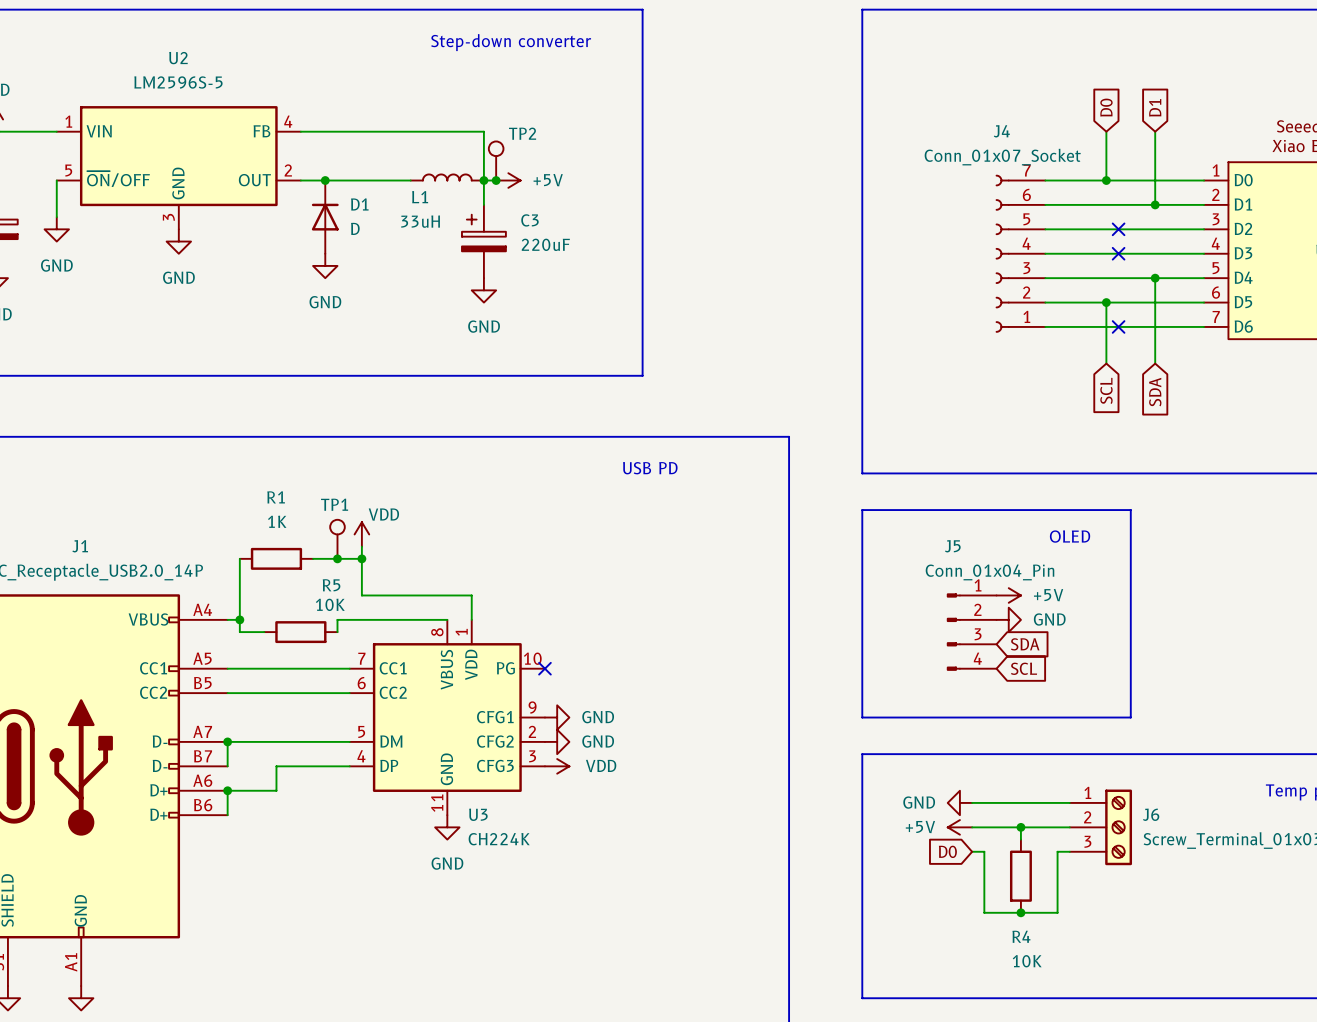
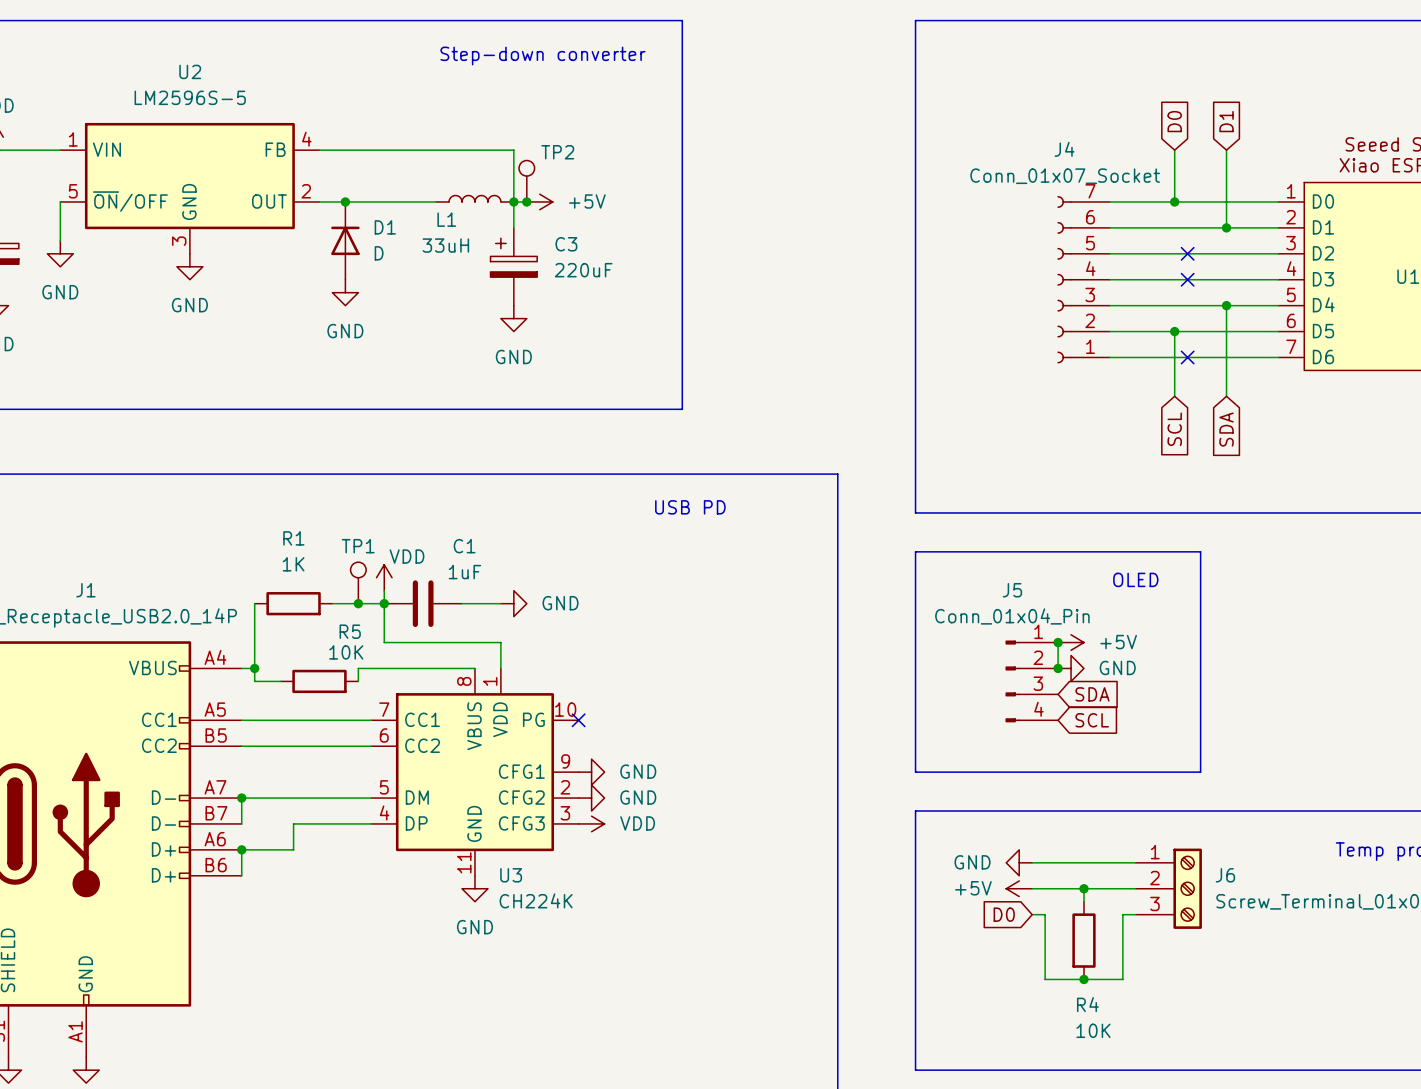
C1: none -> 1uF (423, 603)
wire: none -> (462, 603) (500, 603)
power symbol: none -> GND (513, 603)
J5 value position: Conn_01x04_Pin (989, 572) -> Conn_01x04_Pin (1012, 616)
wire: none -> (1058, 642) (1058, 668)
junction: none -> (1058, 642)
junction: none -> (1058, 668)

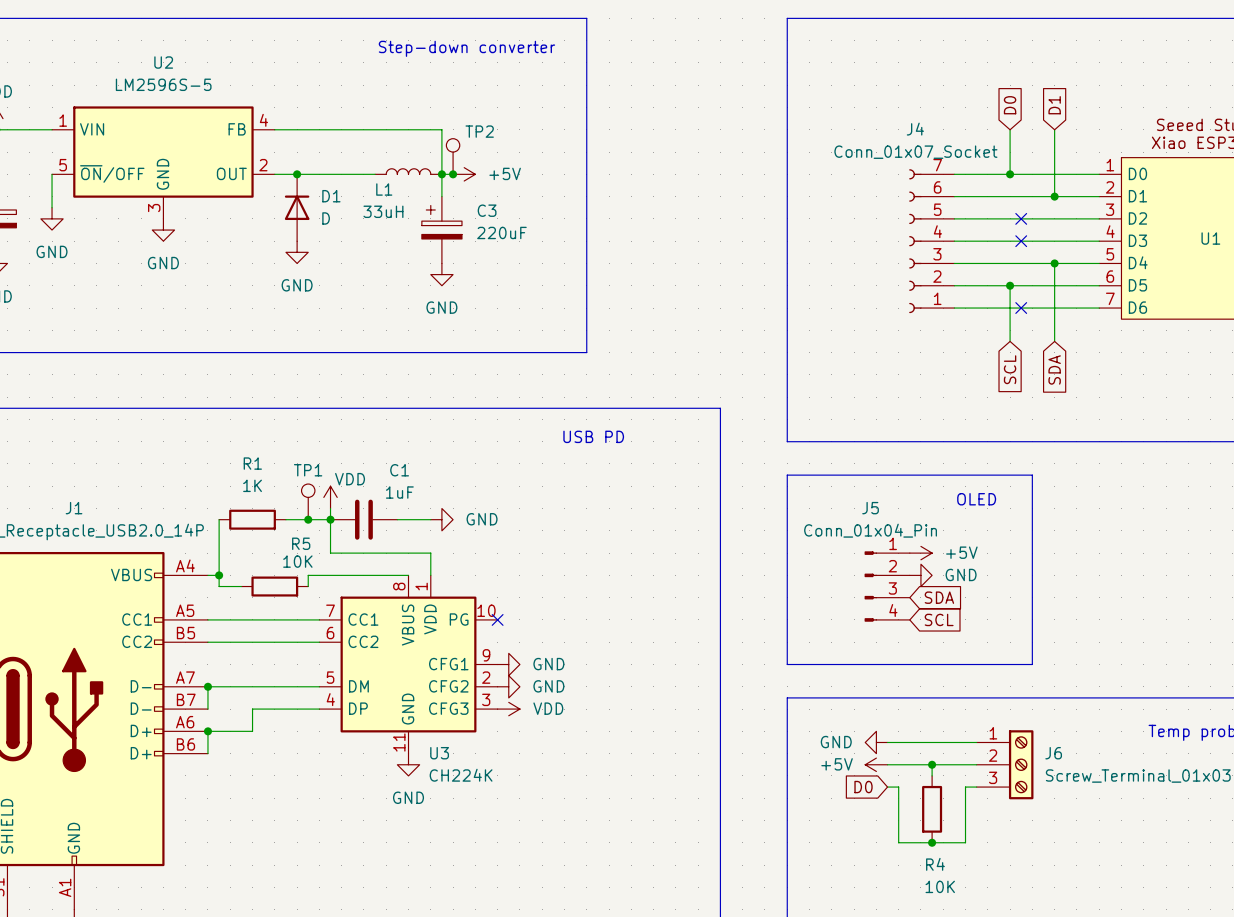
wire: (1058, 642) (1058, 668) -> none
junction: (1058, 642) -> none
junction: (1058, 668) -> none

